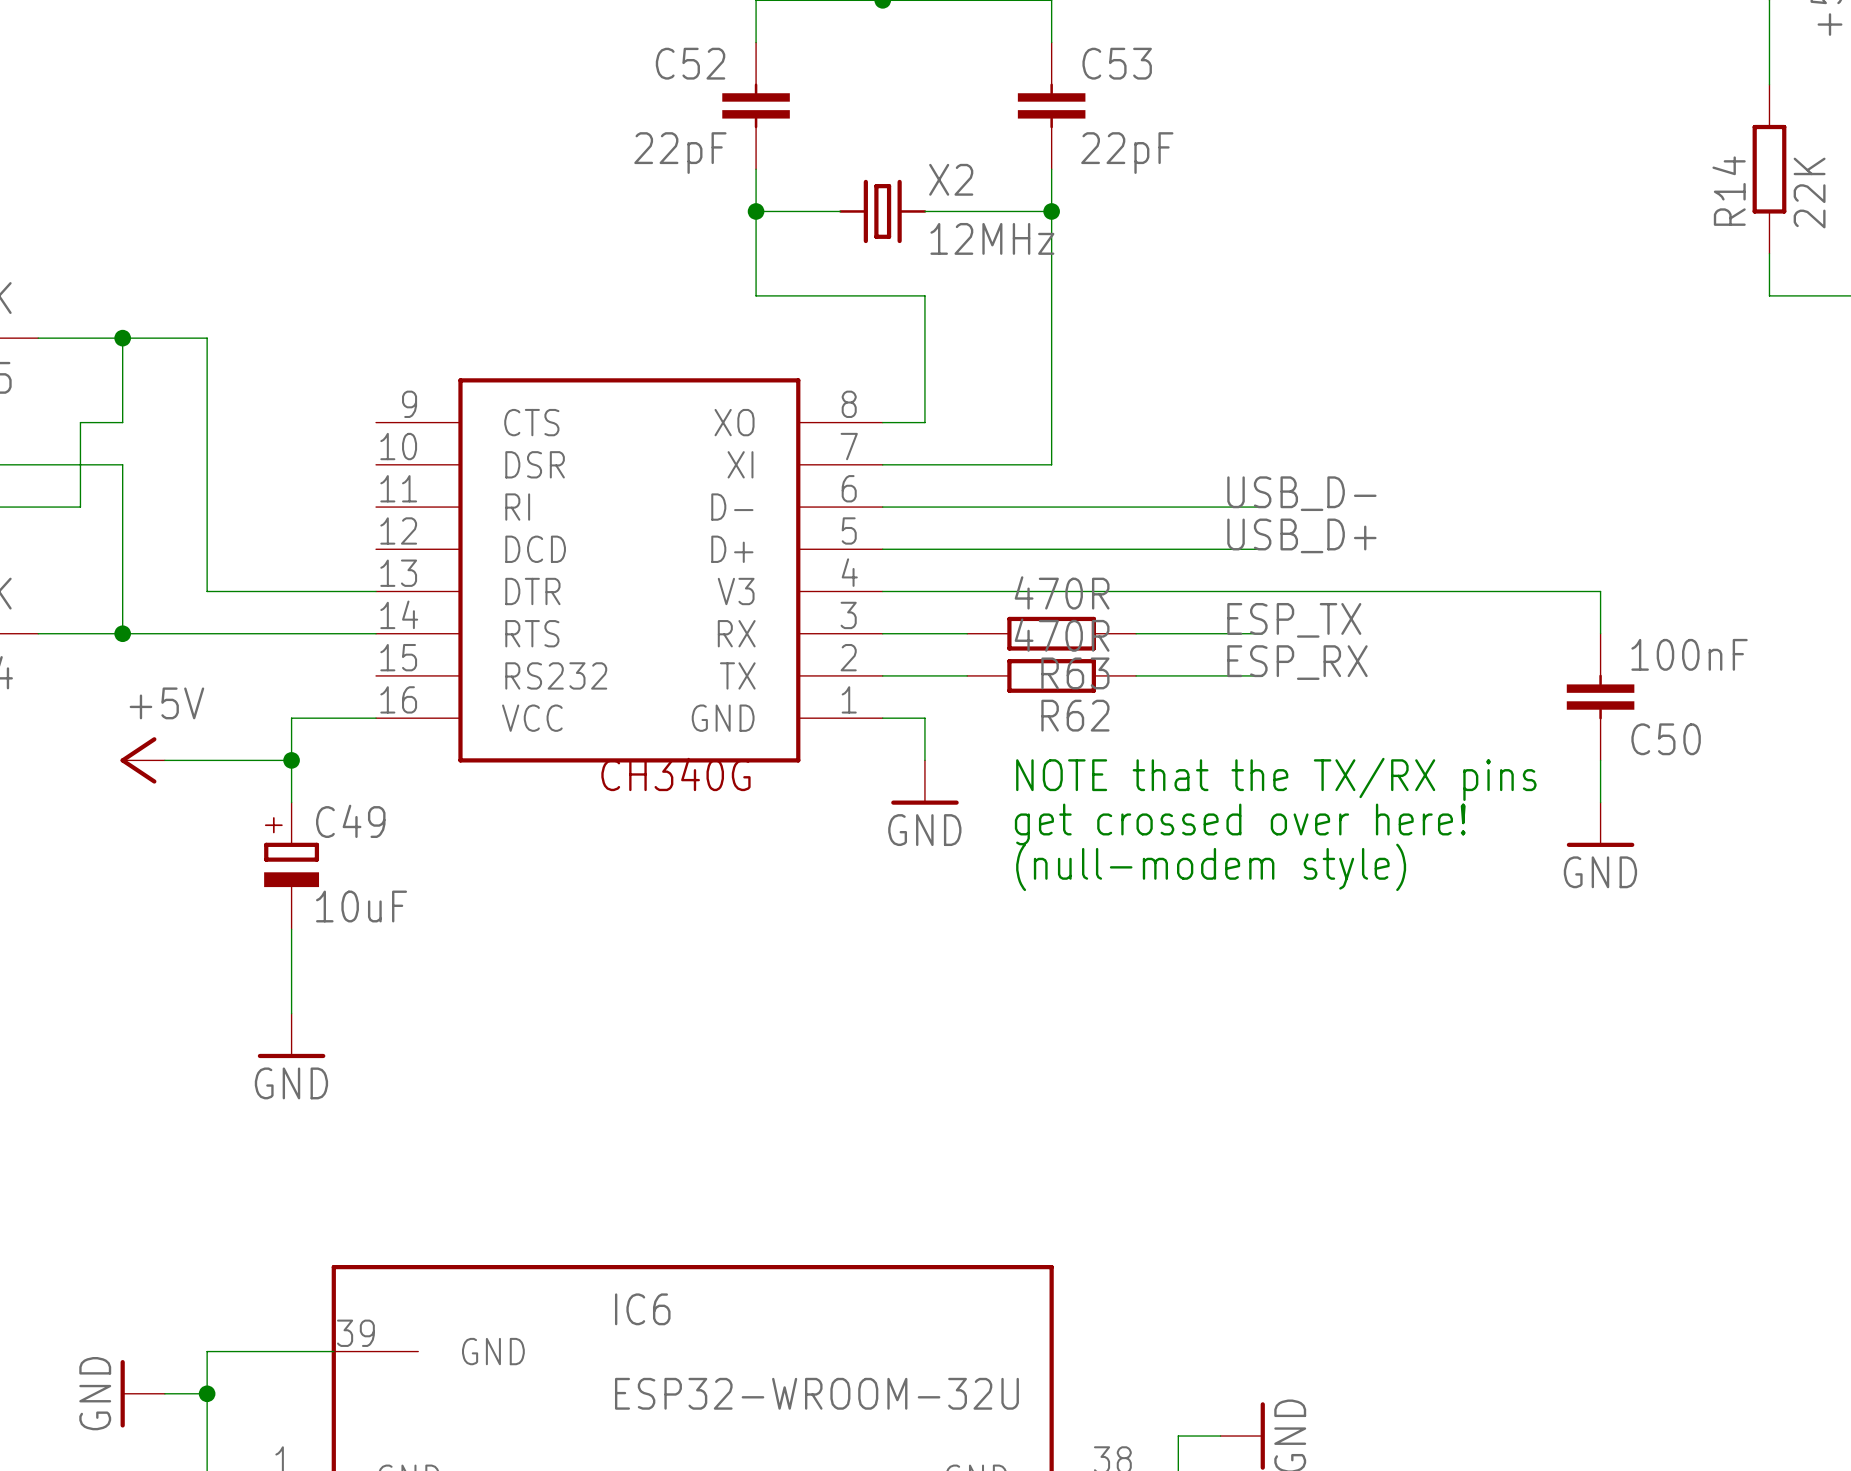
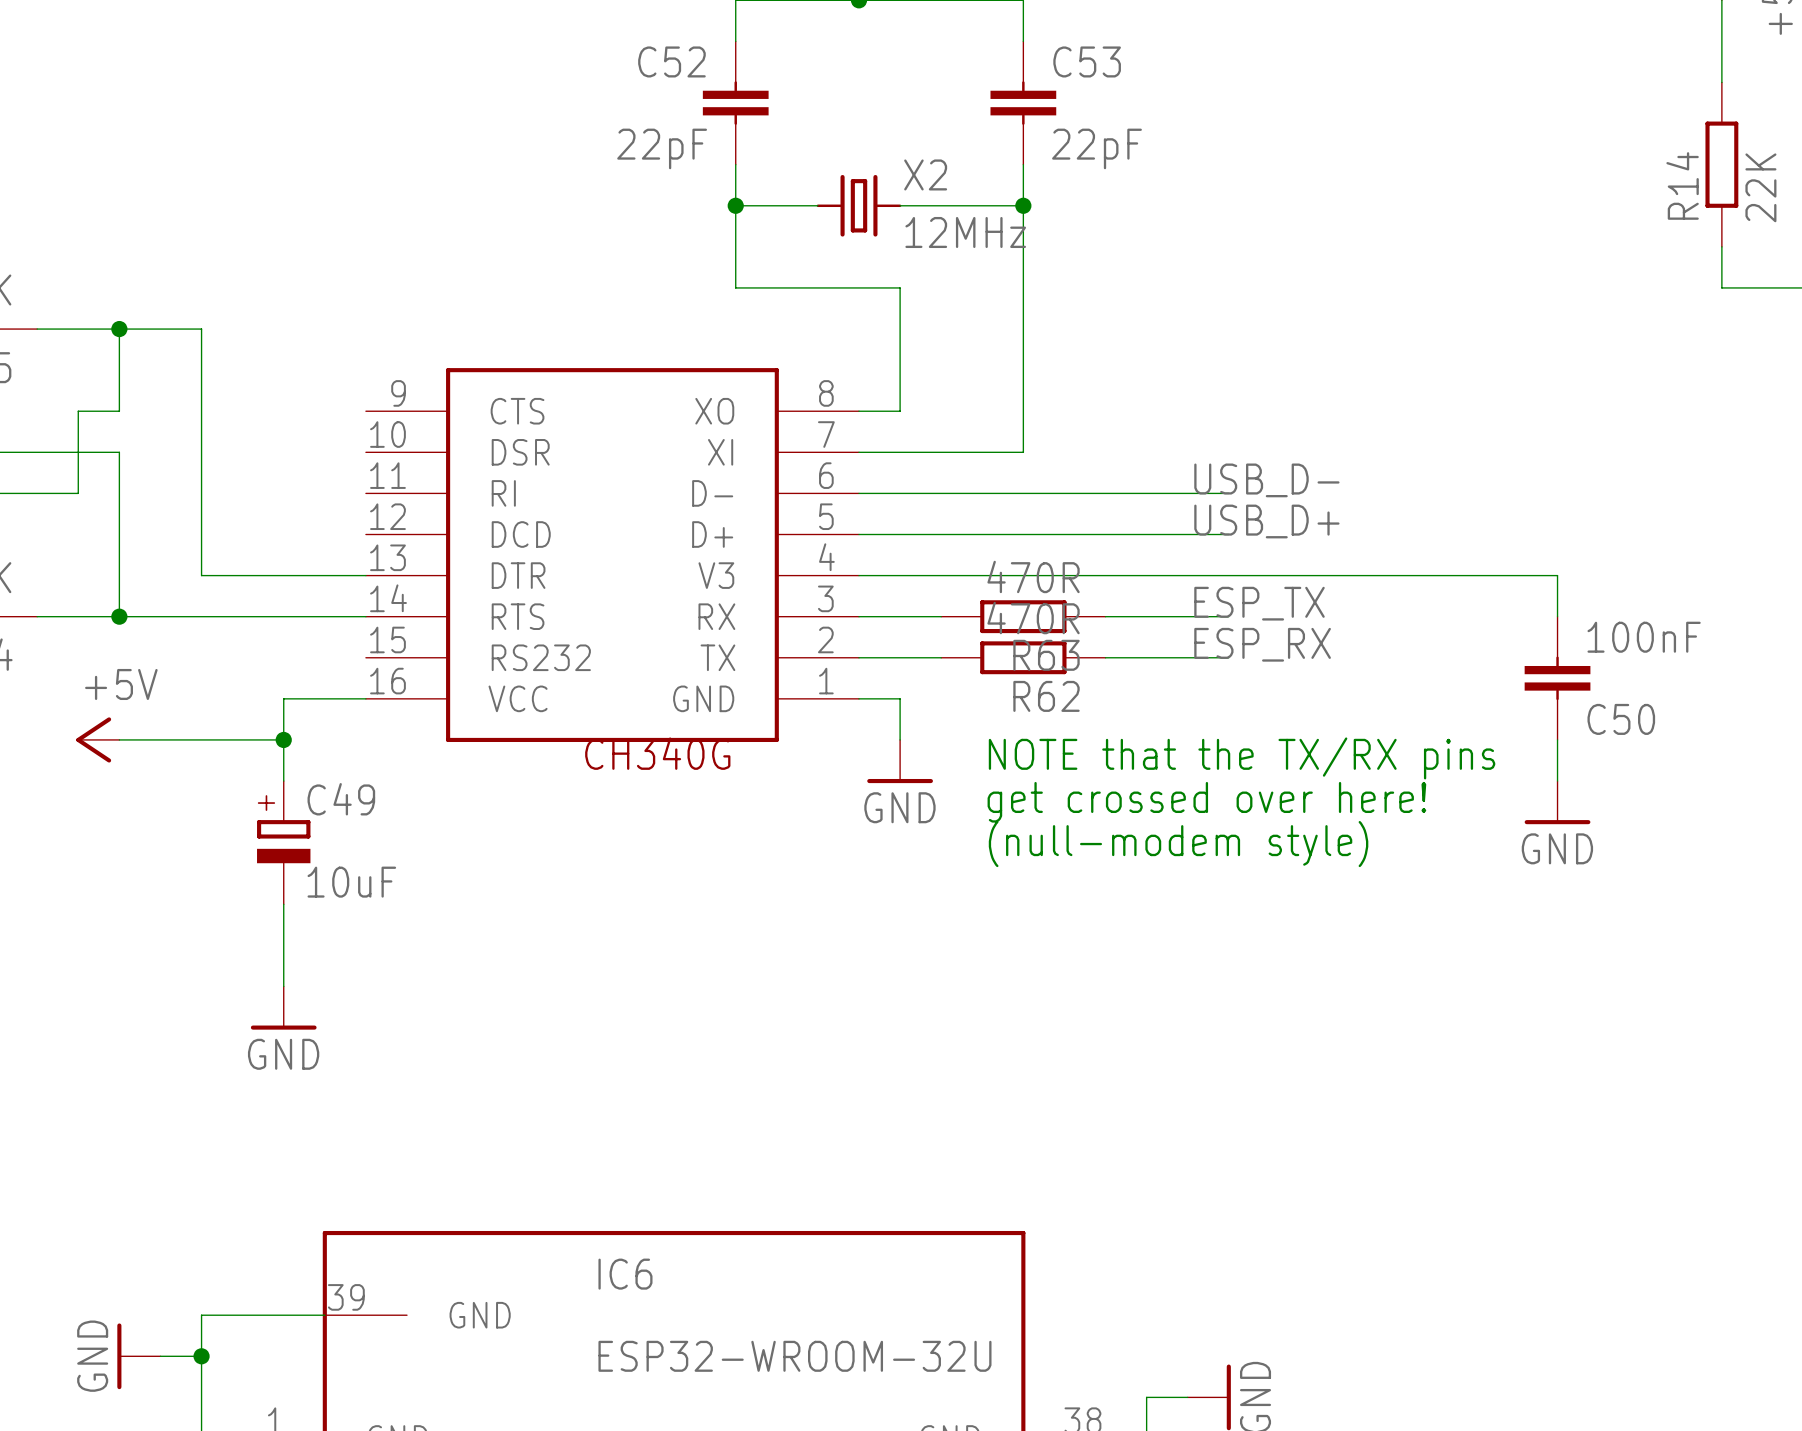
power symbol position: +5V (142, 760) -> +5V (97, 739)

